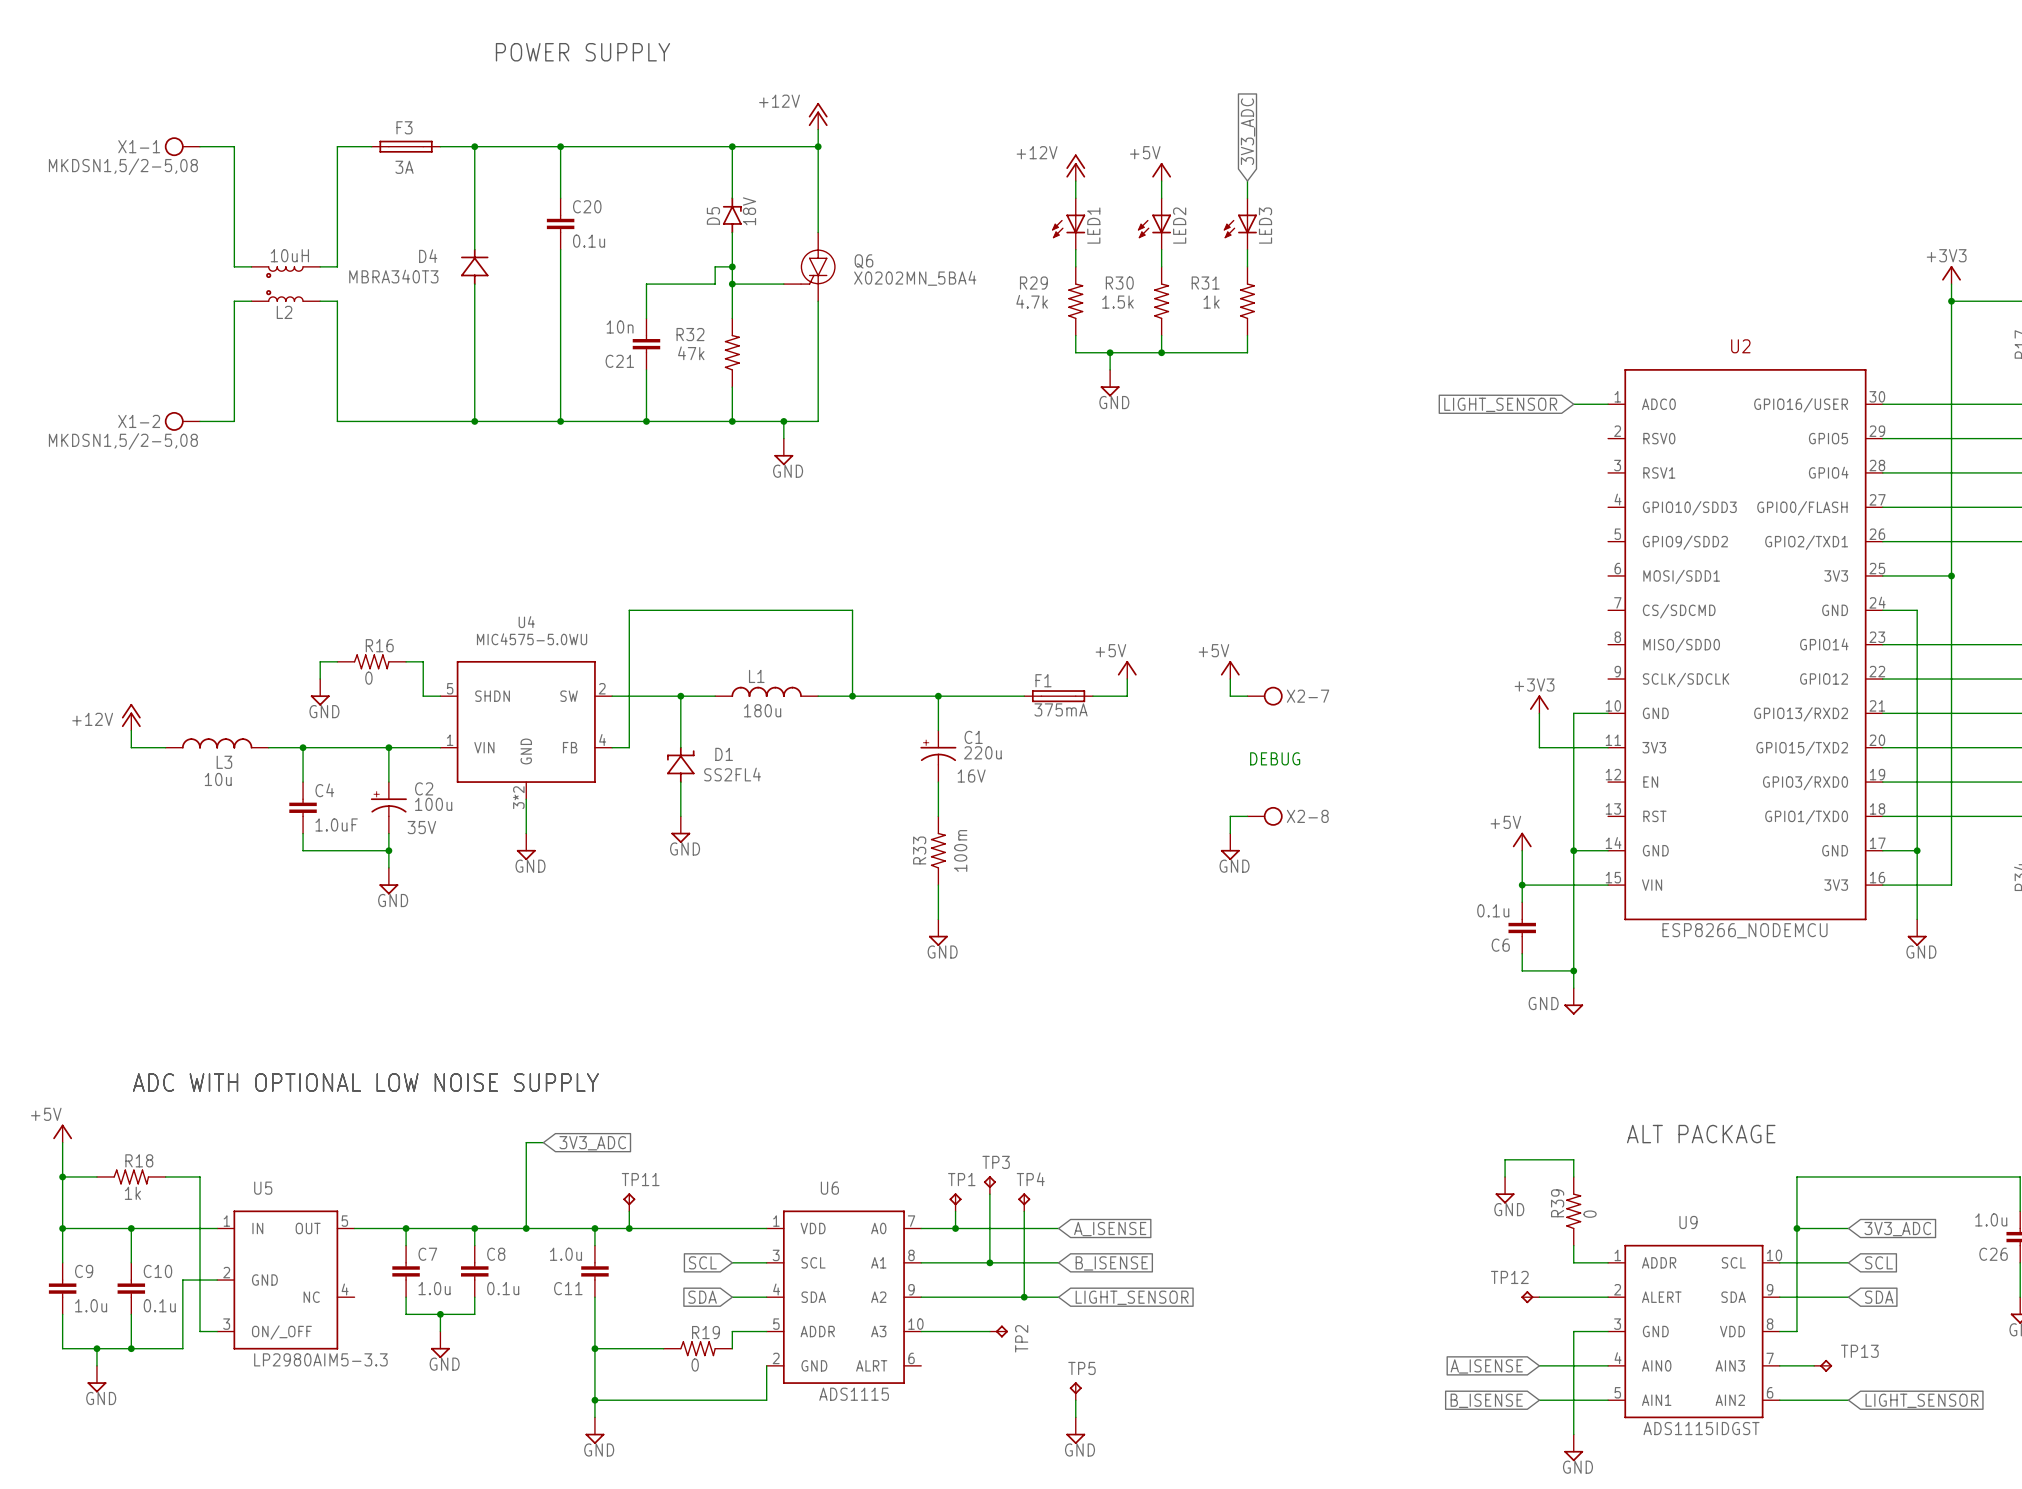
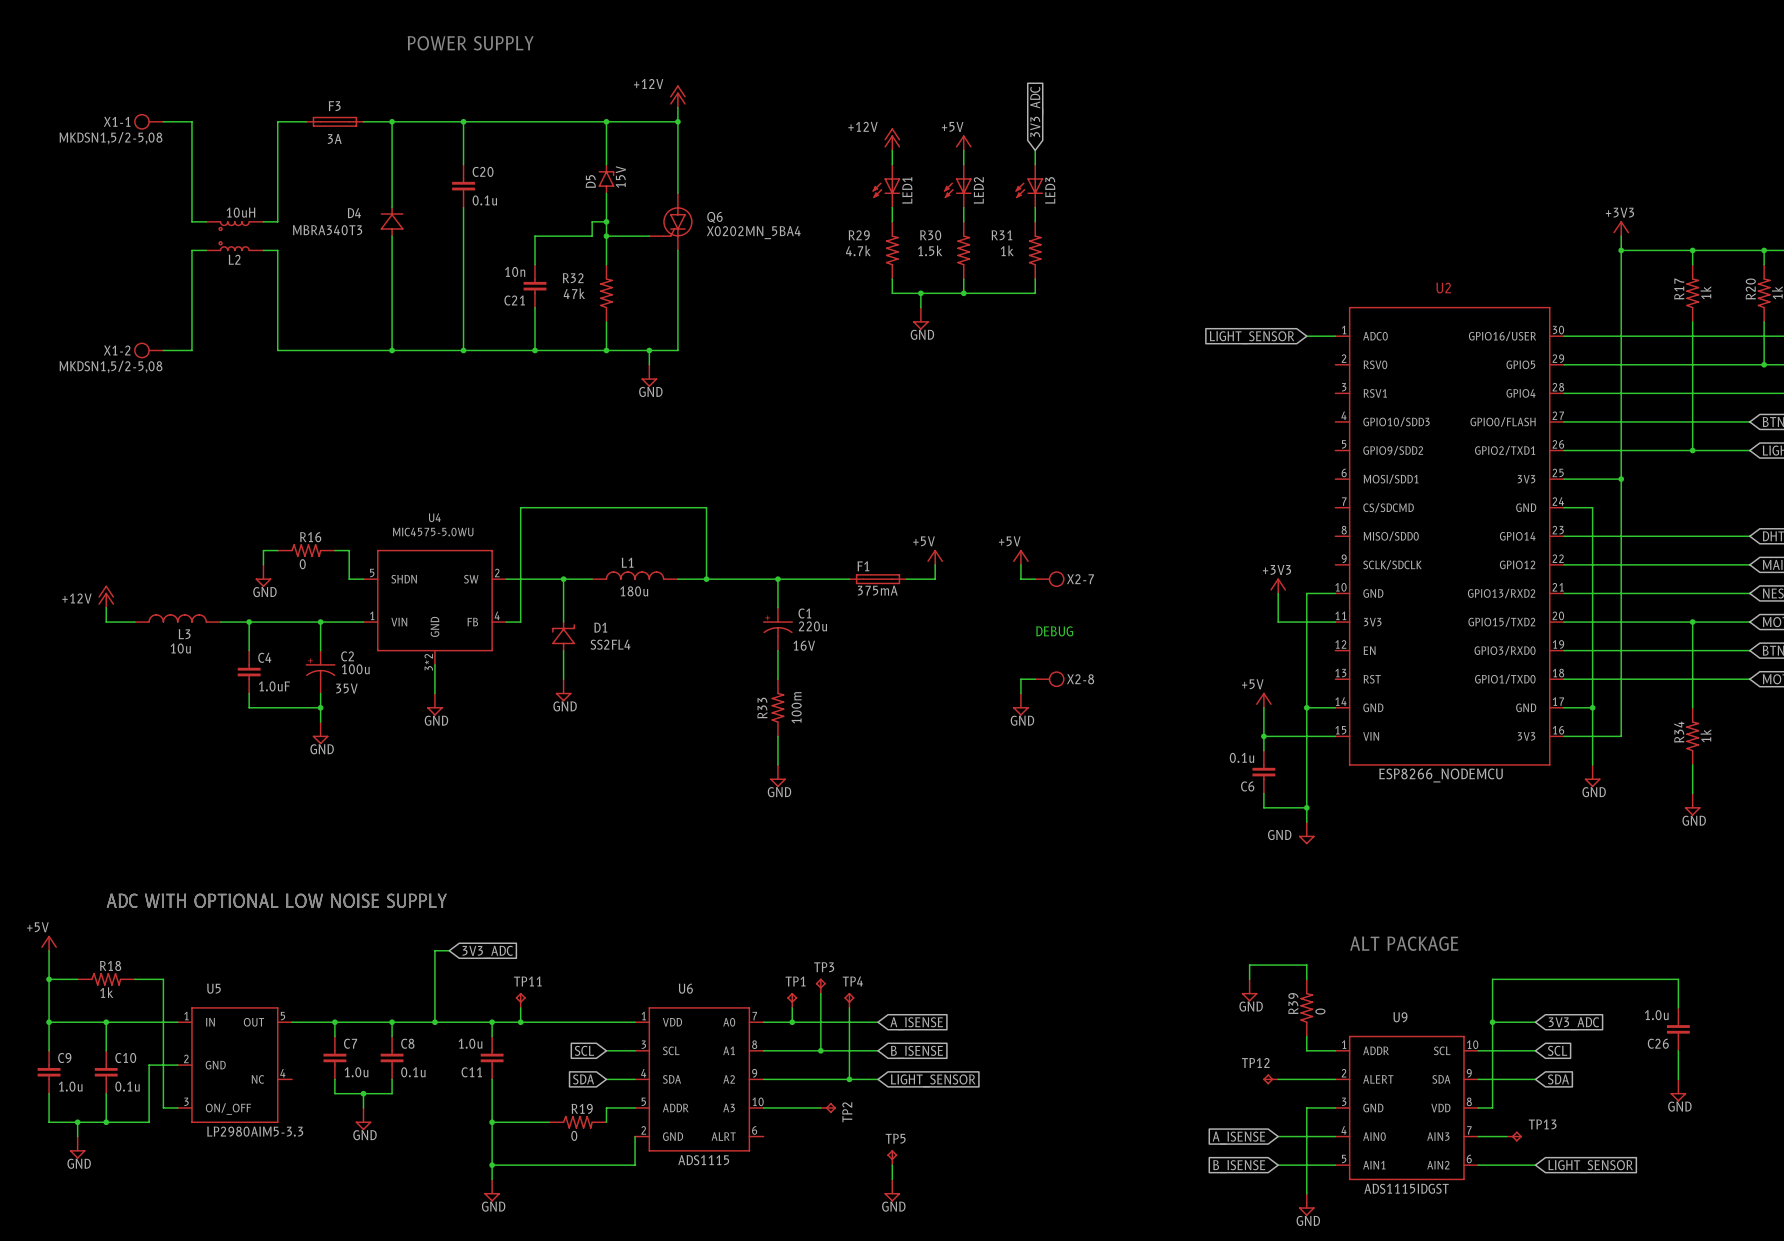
D5 value: 18V (749, 211) -> 15V (620, 177)

